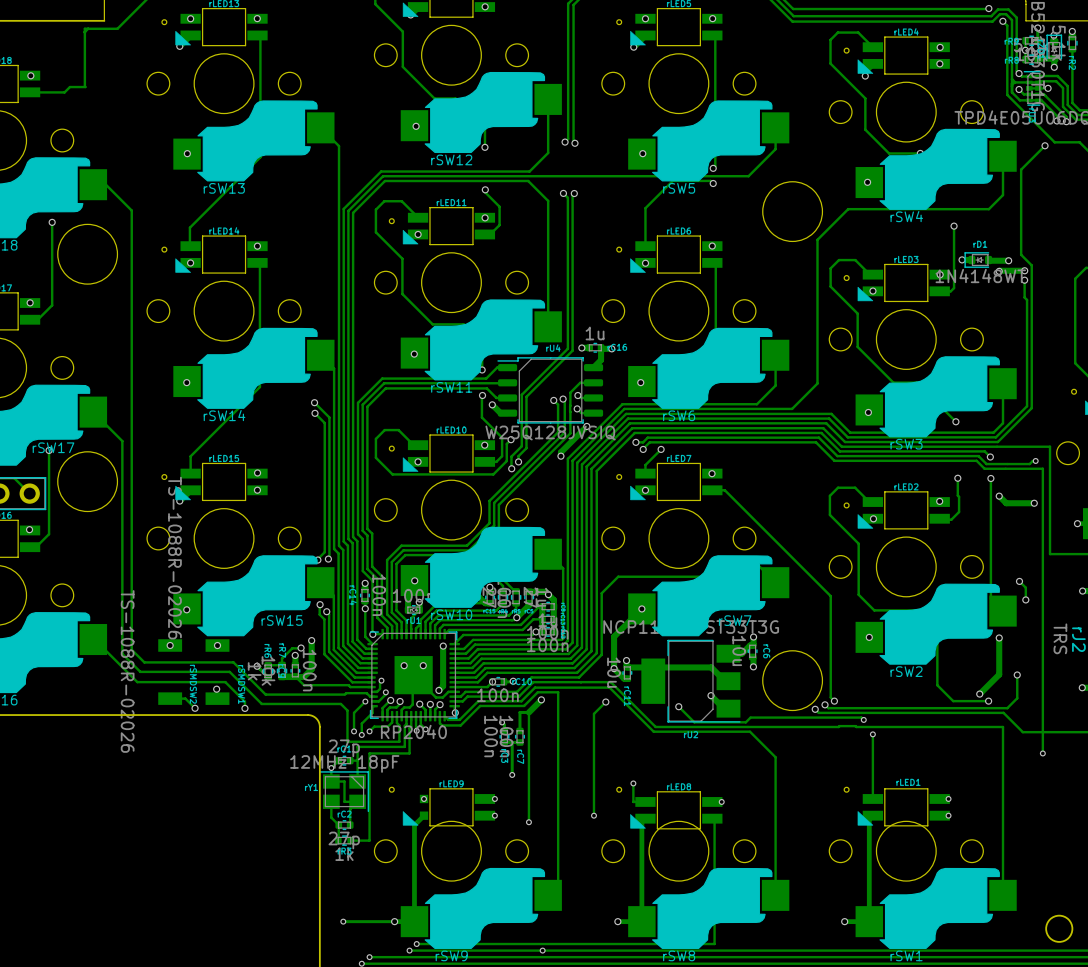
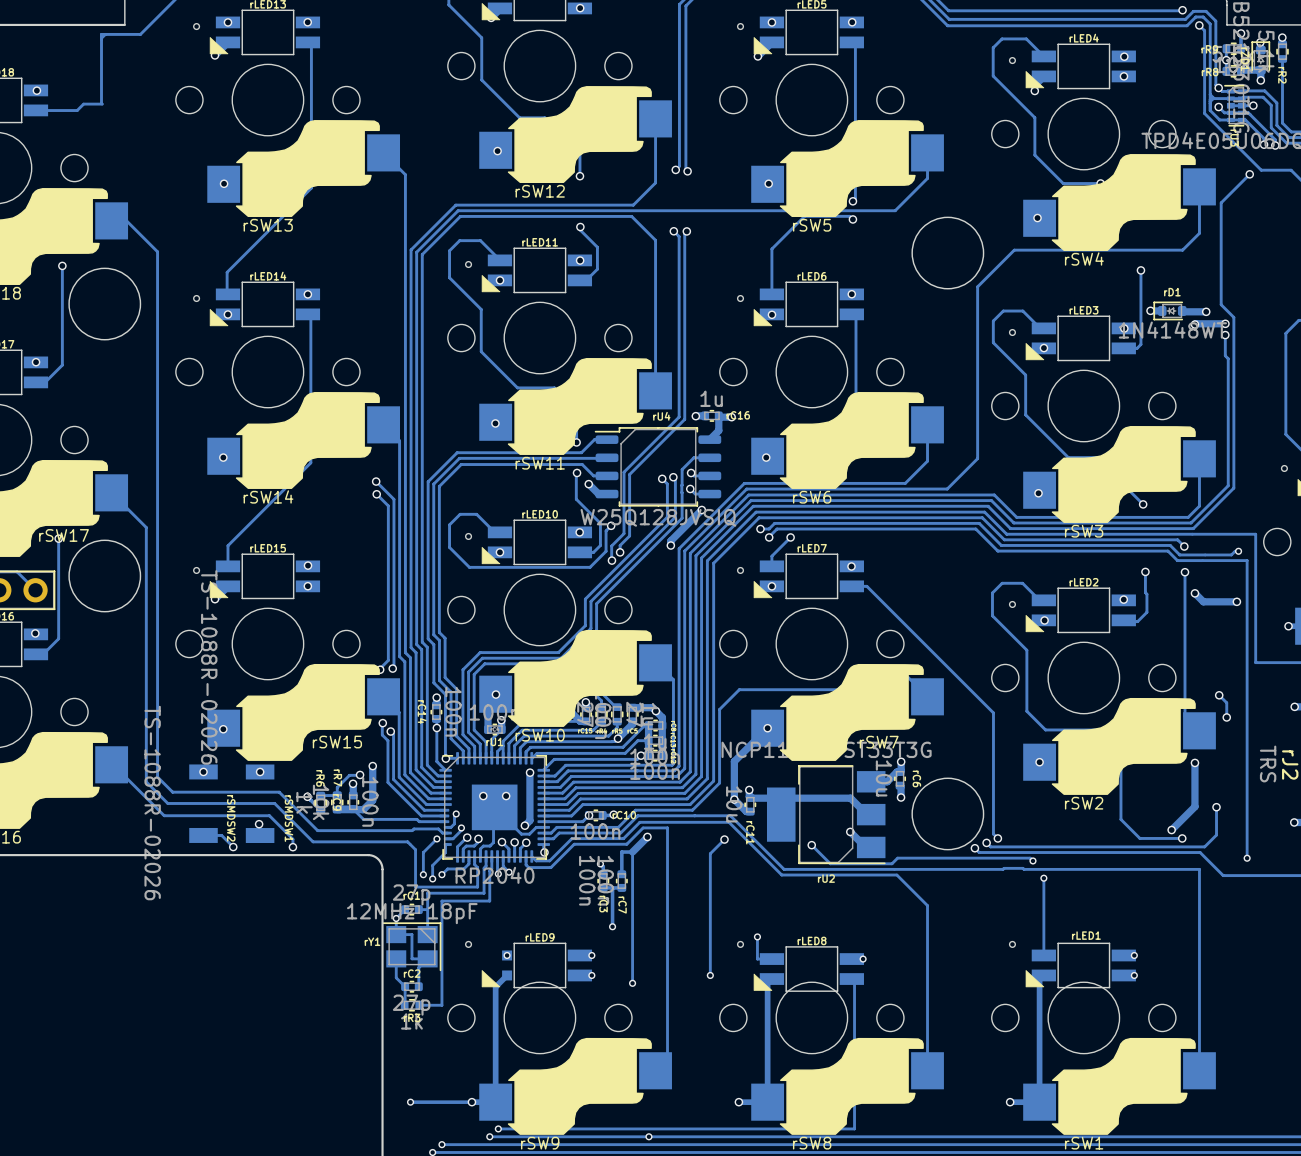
track: (1042, 717) (1042, 753) -> none
via position: (1042, 753) -> (1247, 858)
round board edge: [1045, 914, 1074, 943] -> none

